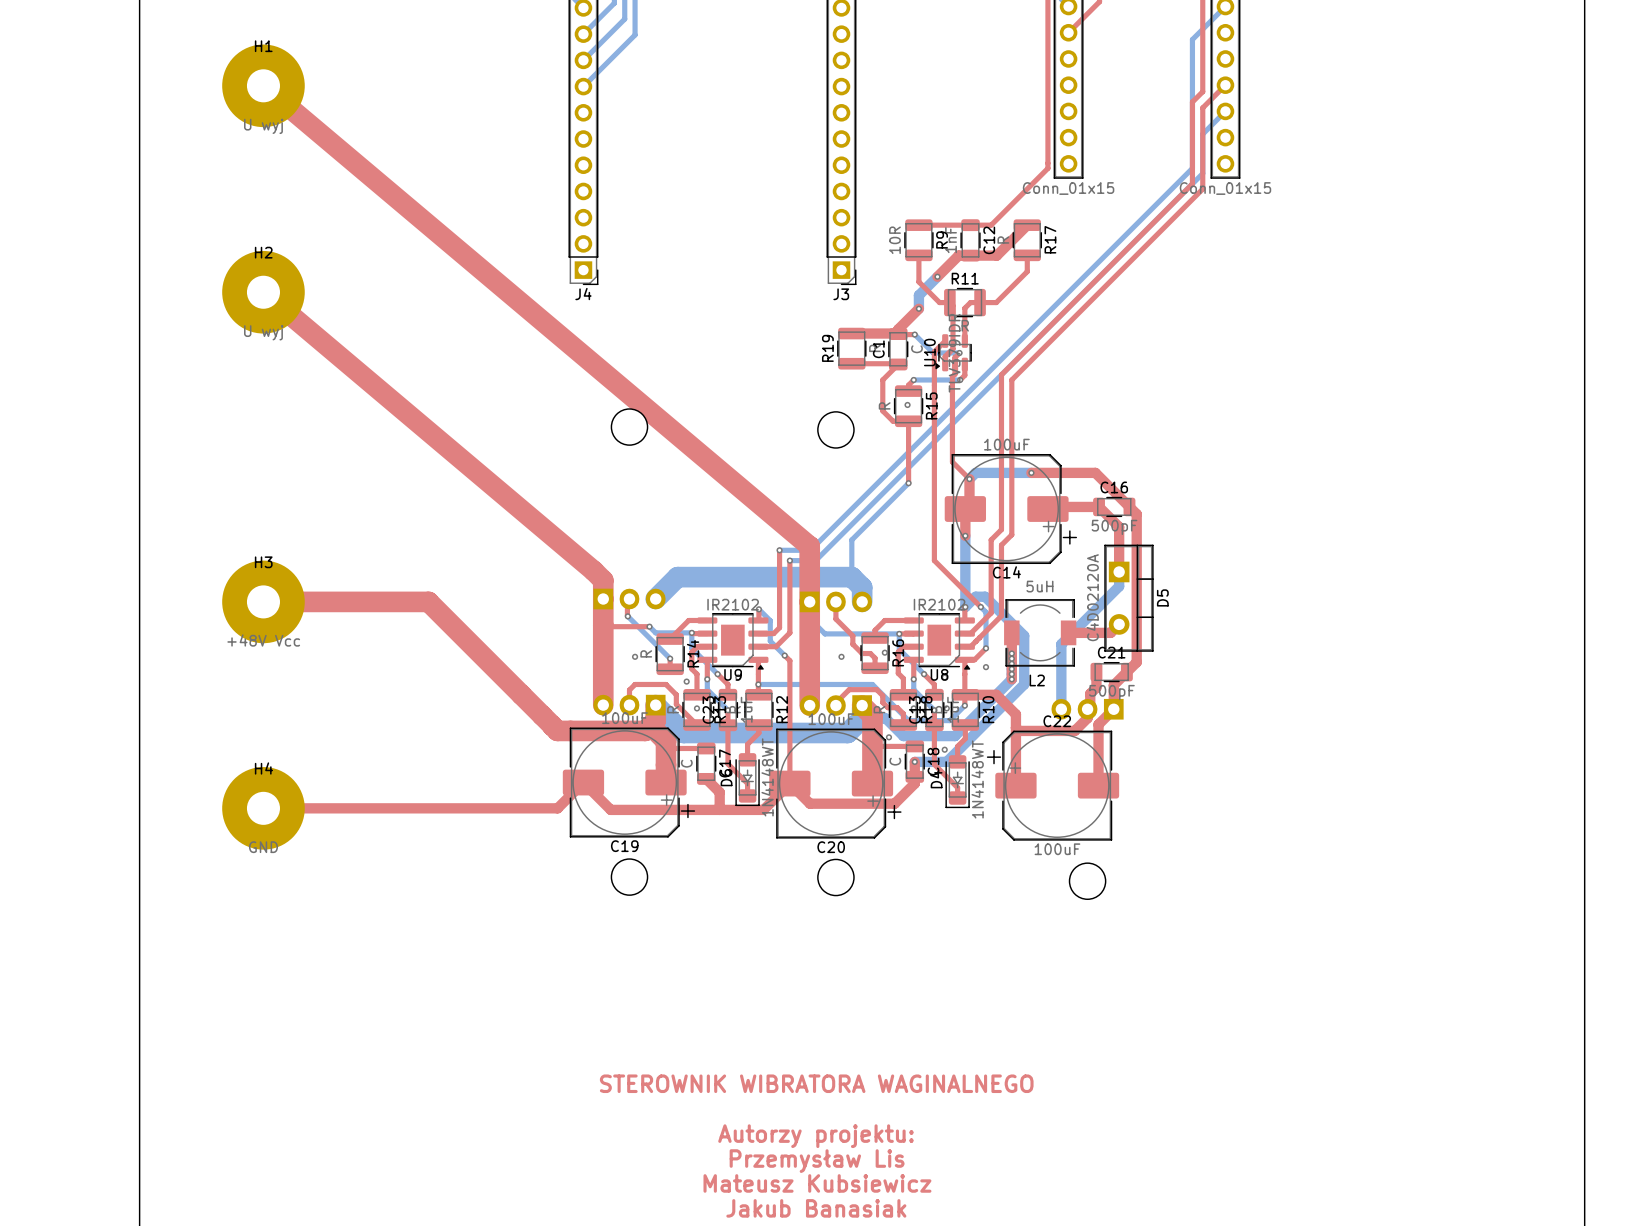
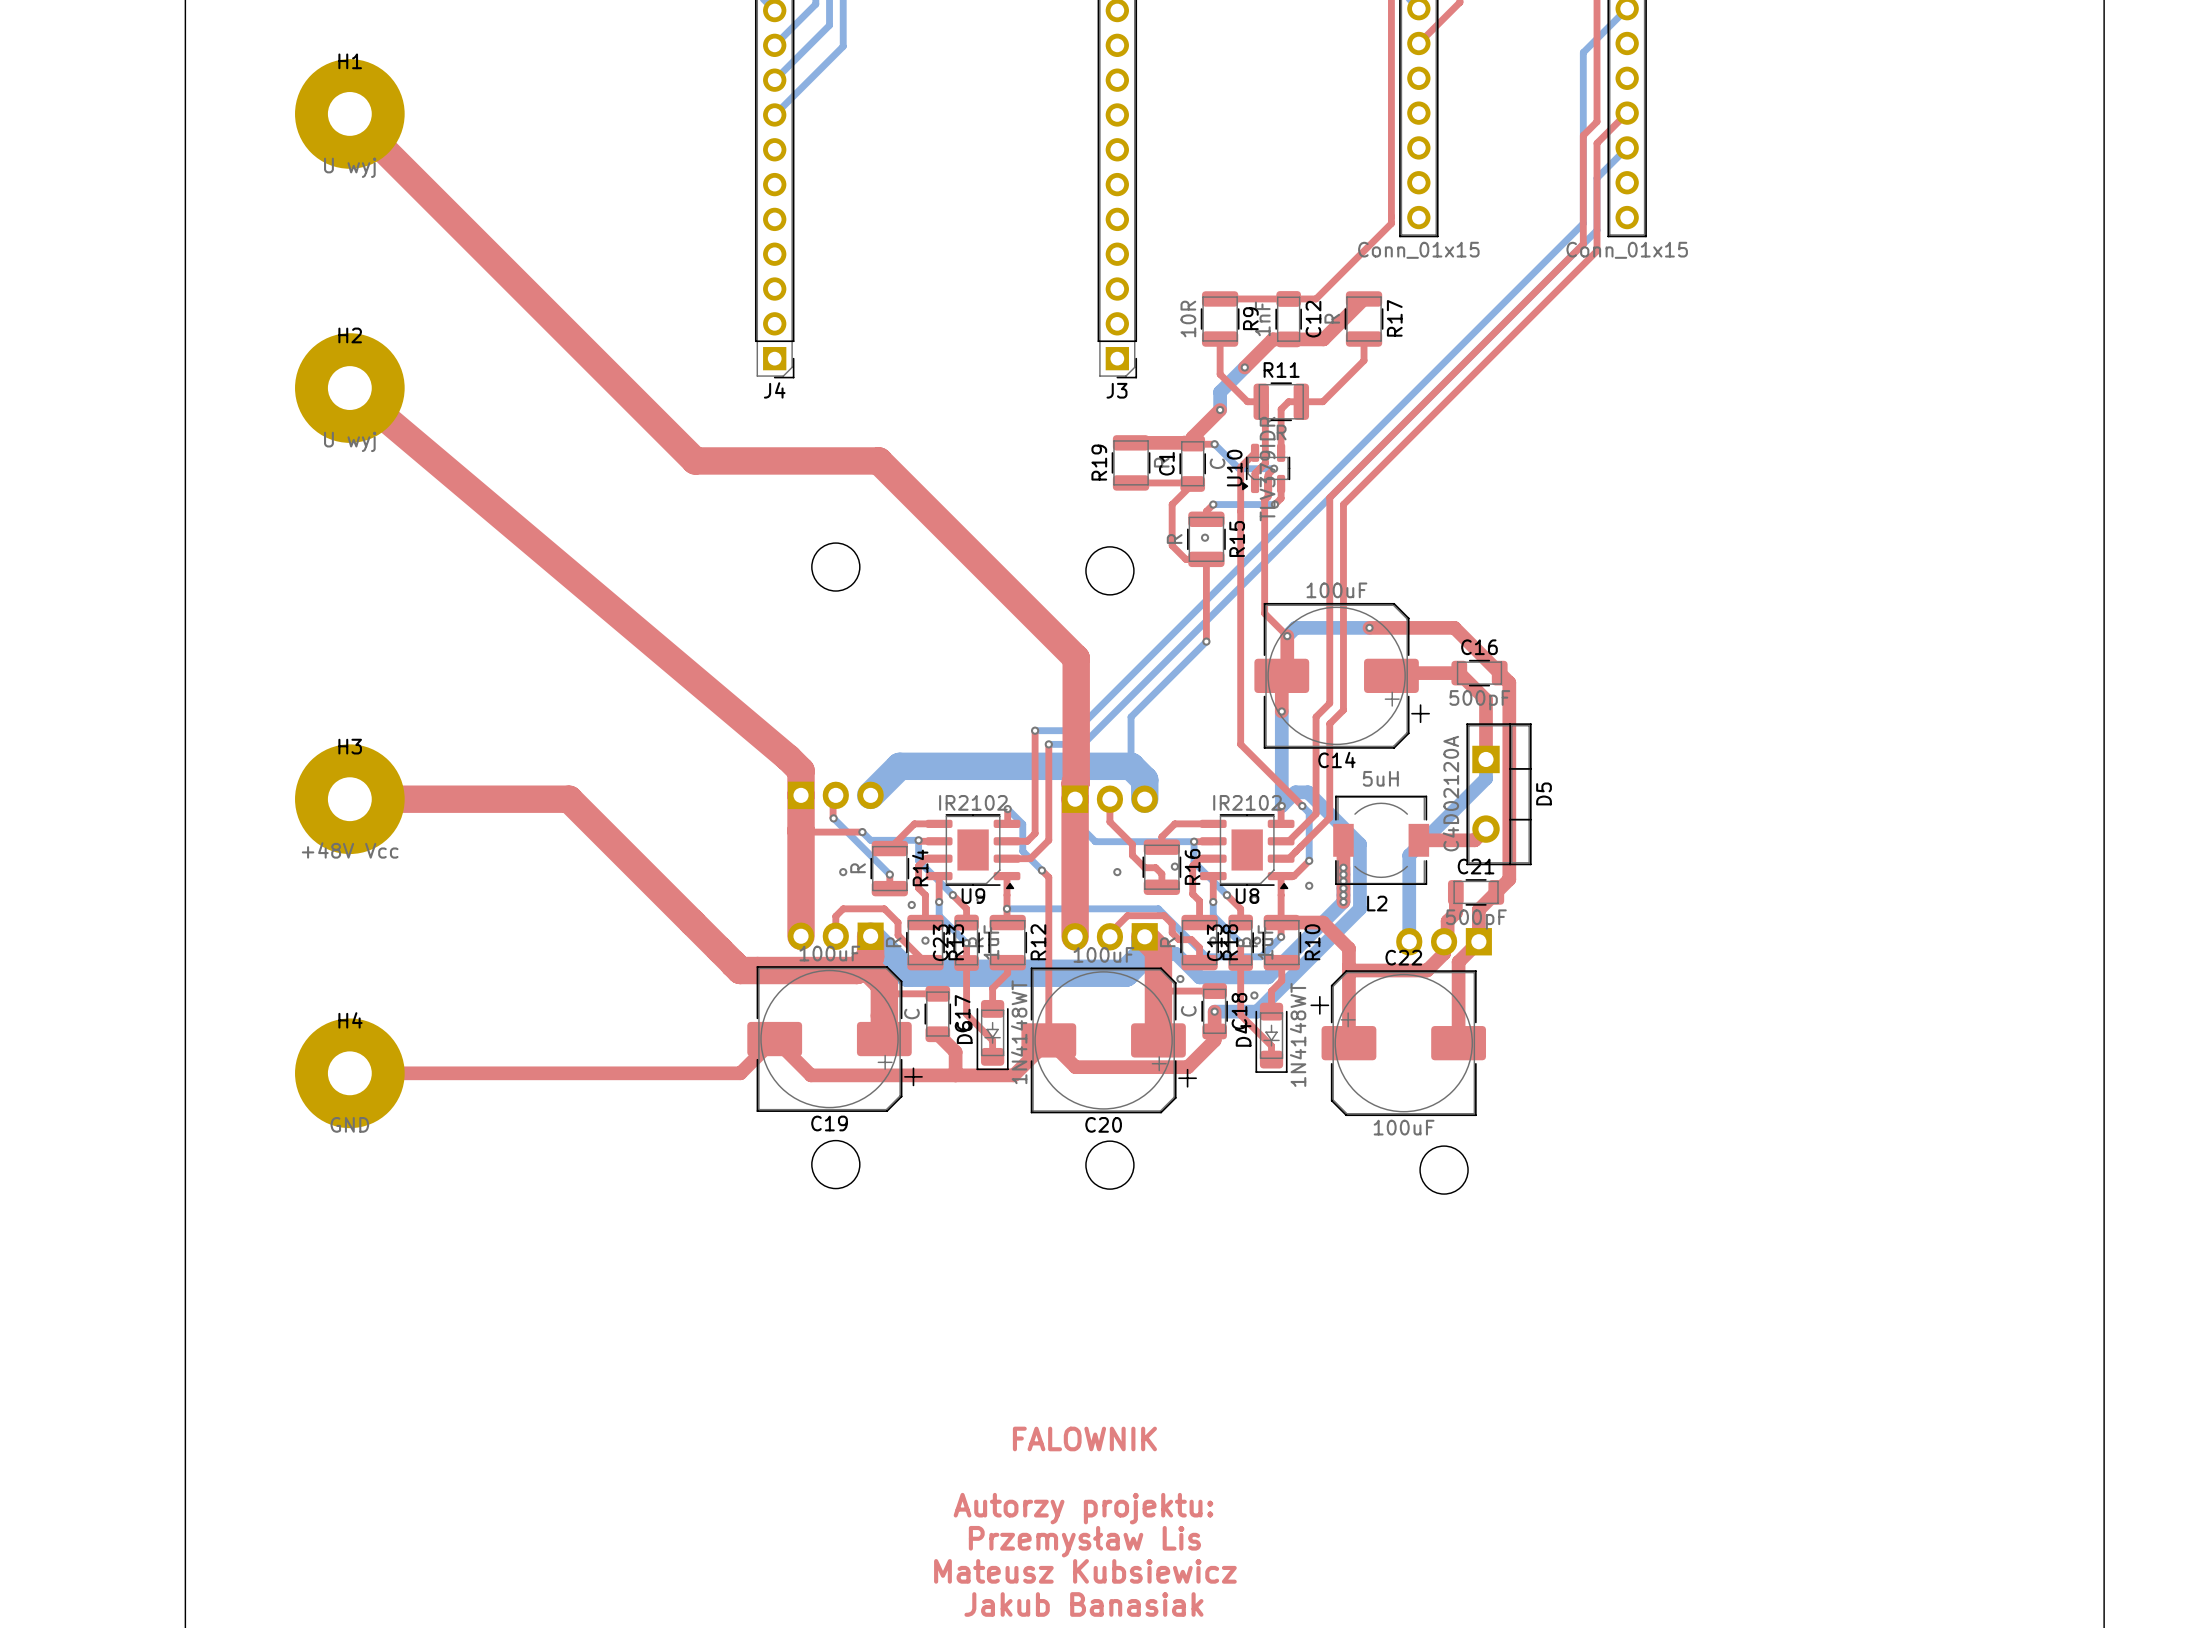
top track: (263, 85) (809, 546) (809, 589) -> (349, 113) (695, 460) (878, 460) (1076, 658) (1075, 783)
text: STEROWNIK WIBRATORA WAGINALNEGO (816, 1083) -> FALOWNIK (1084, 1438)

